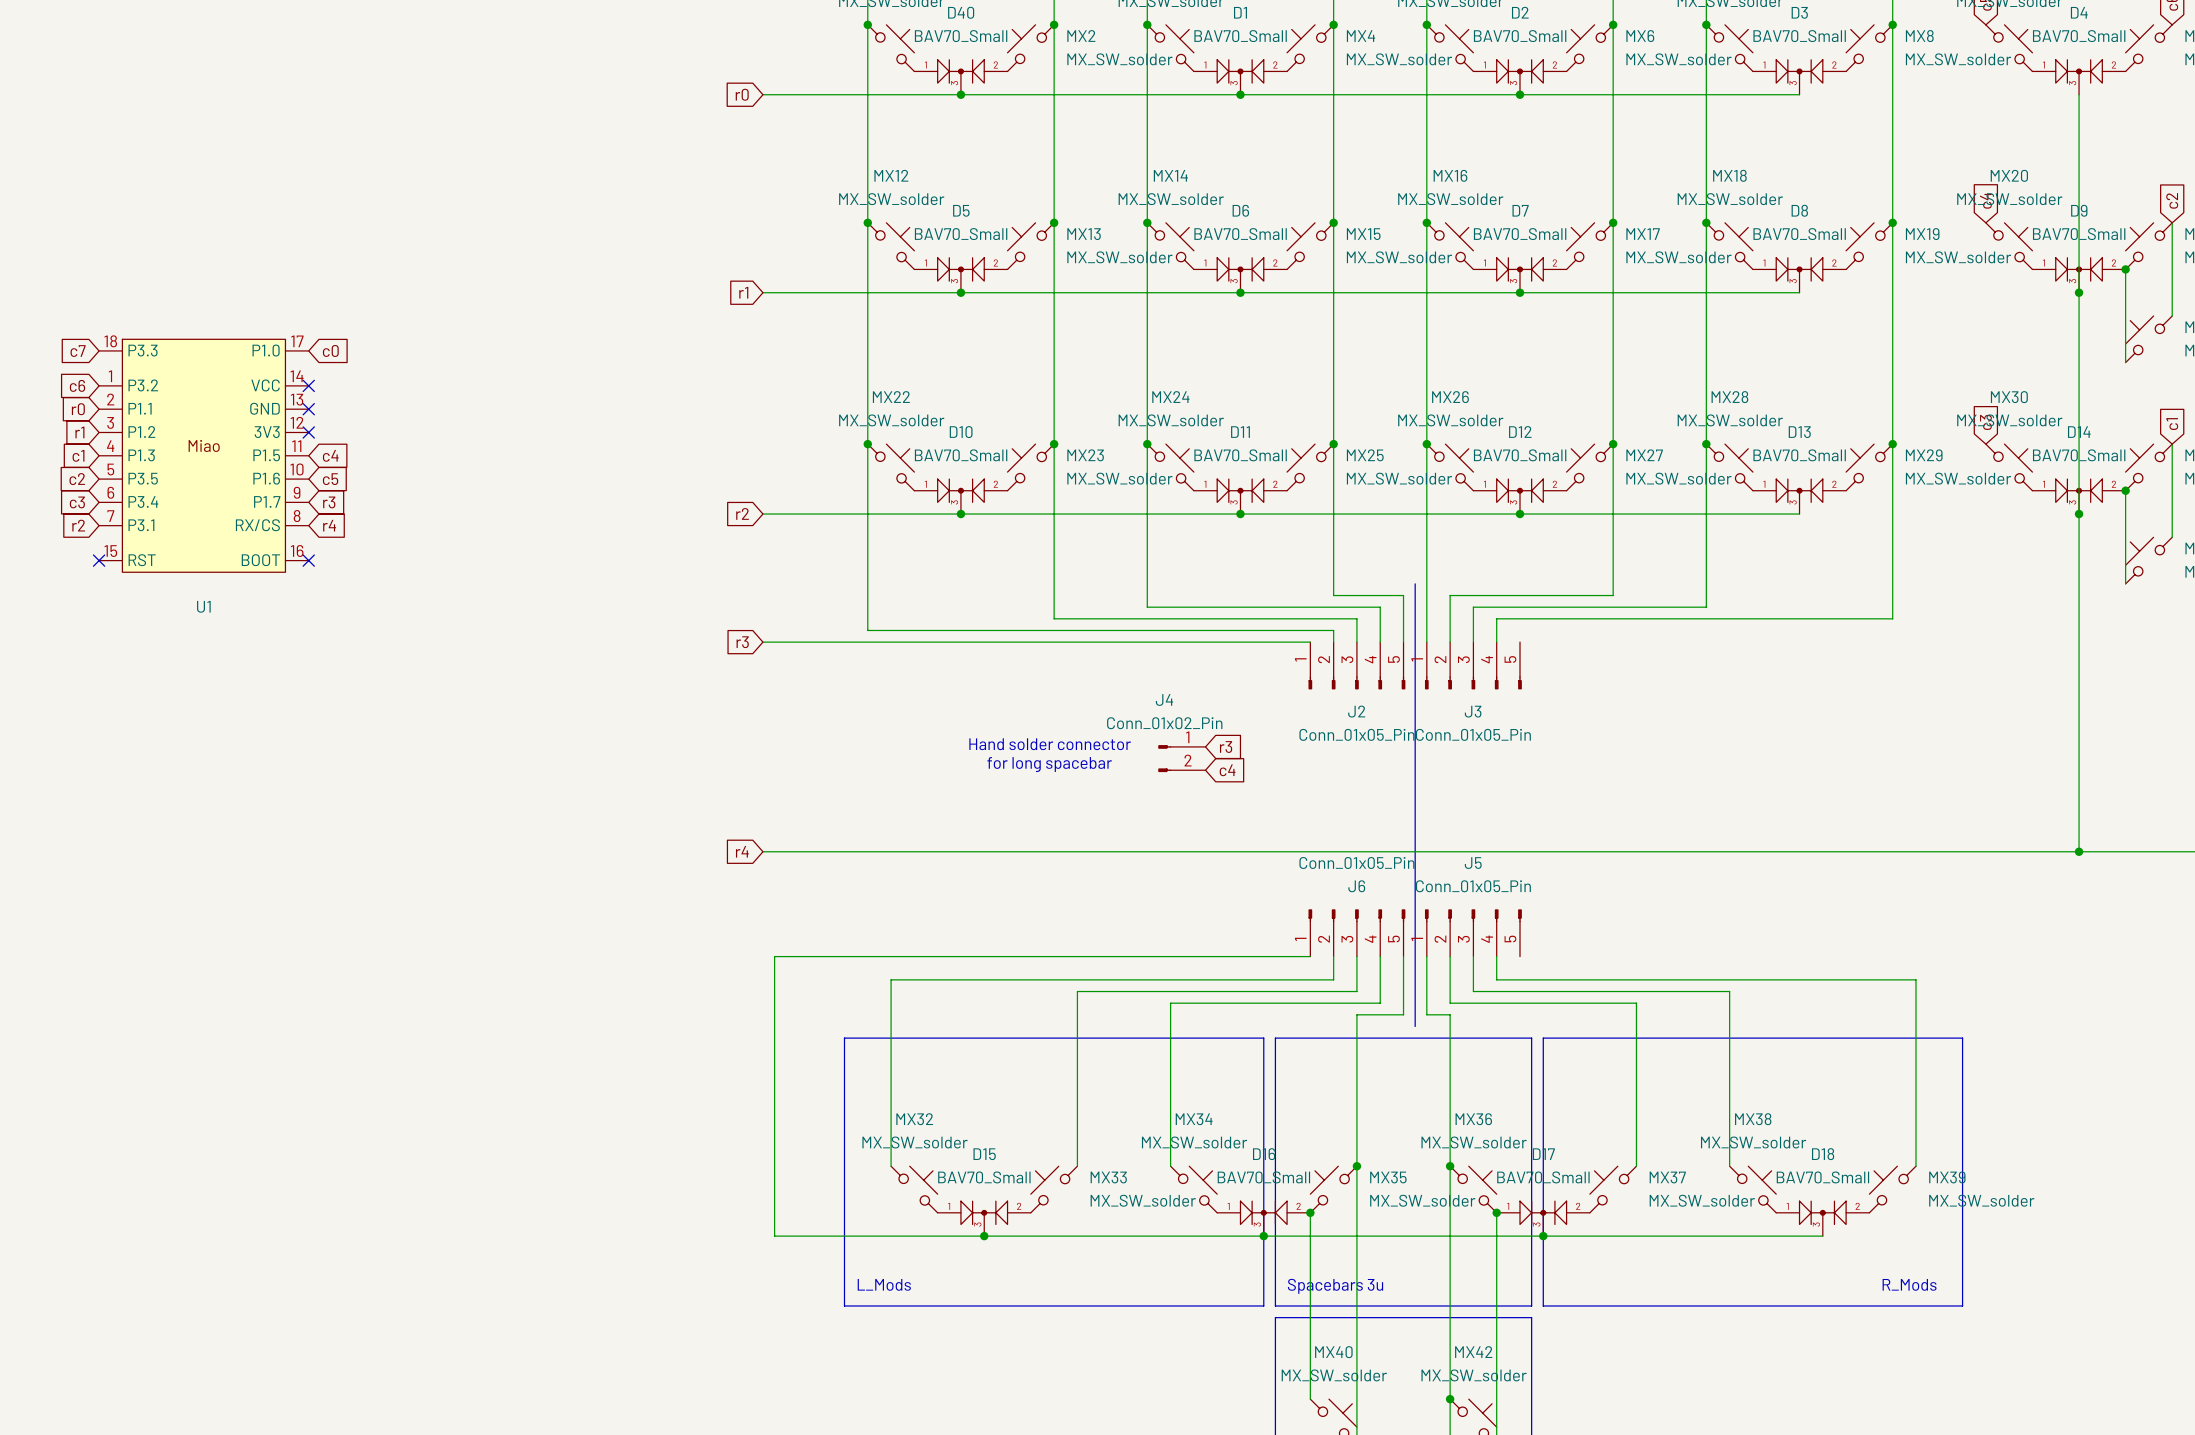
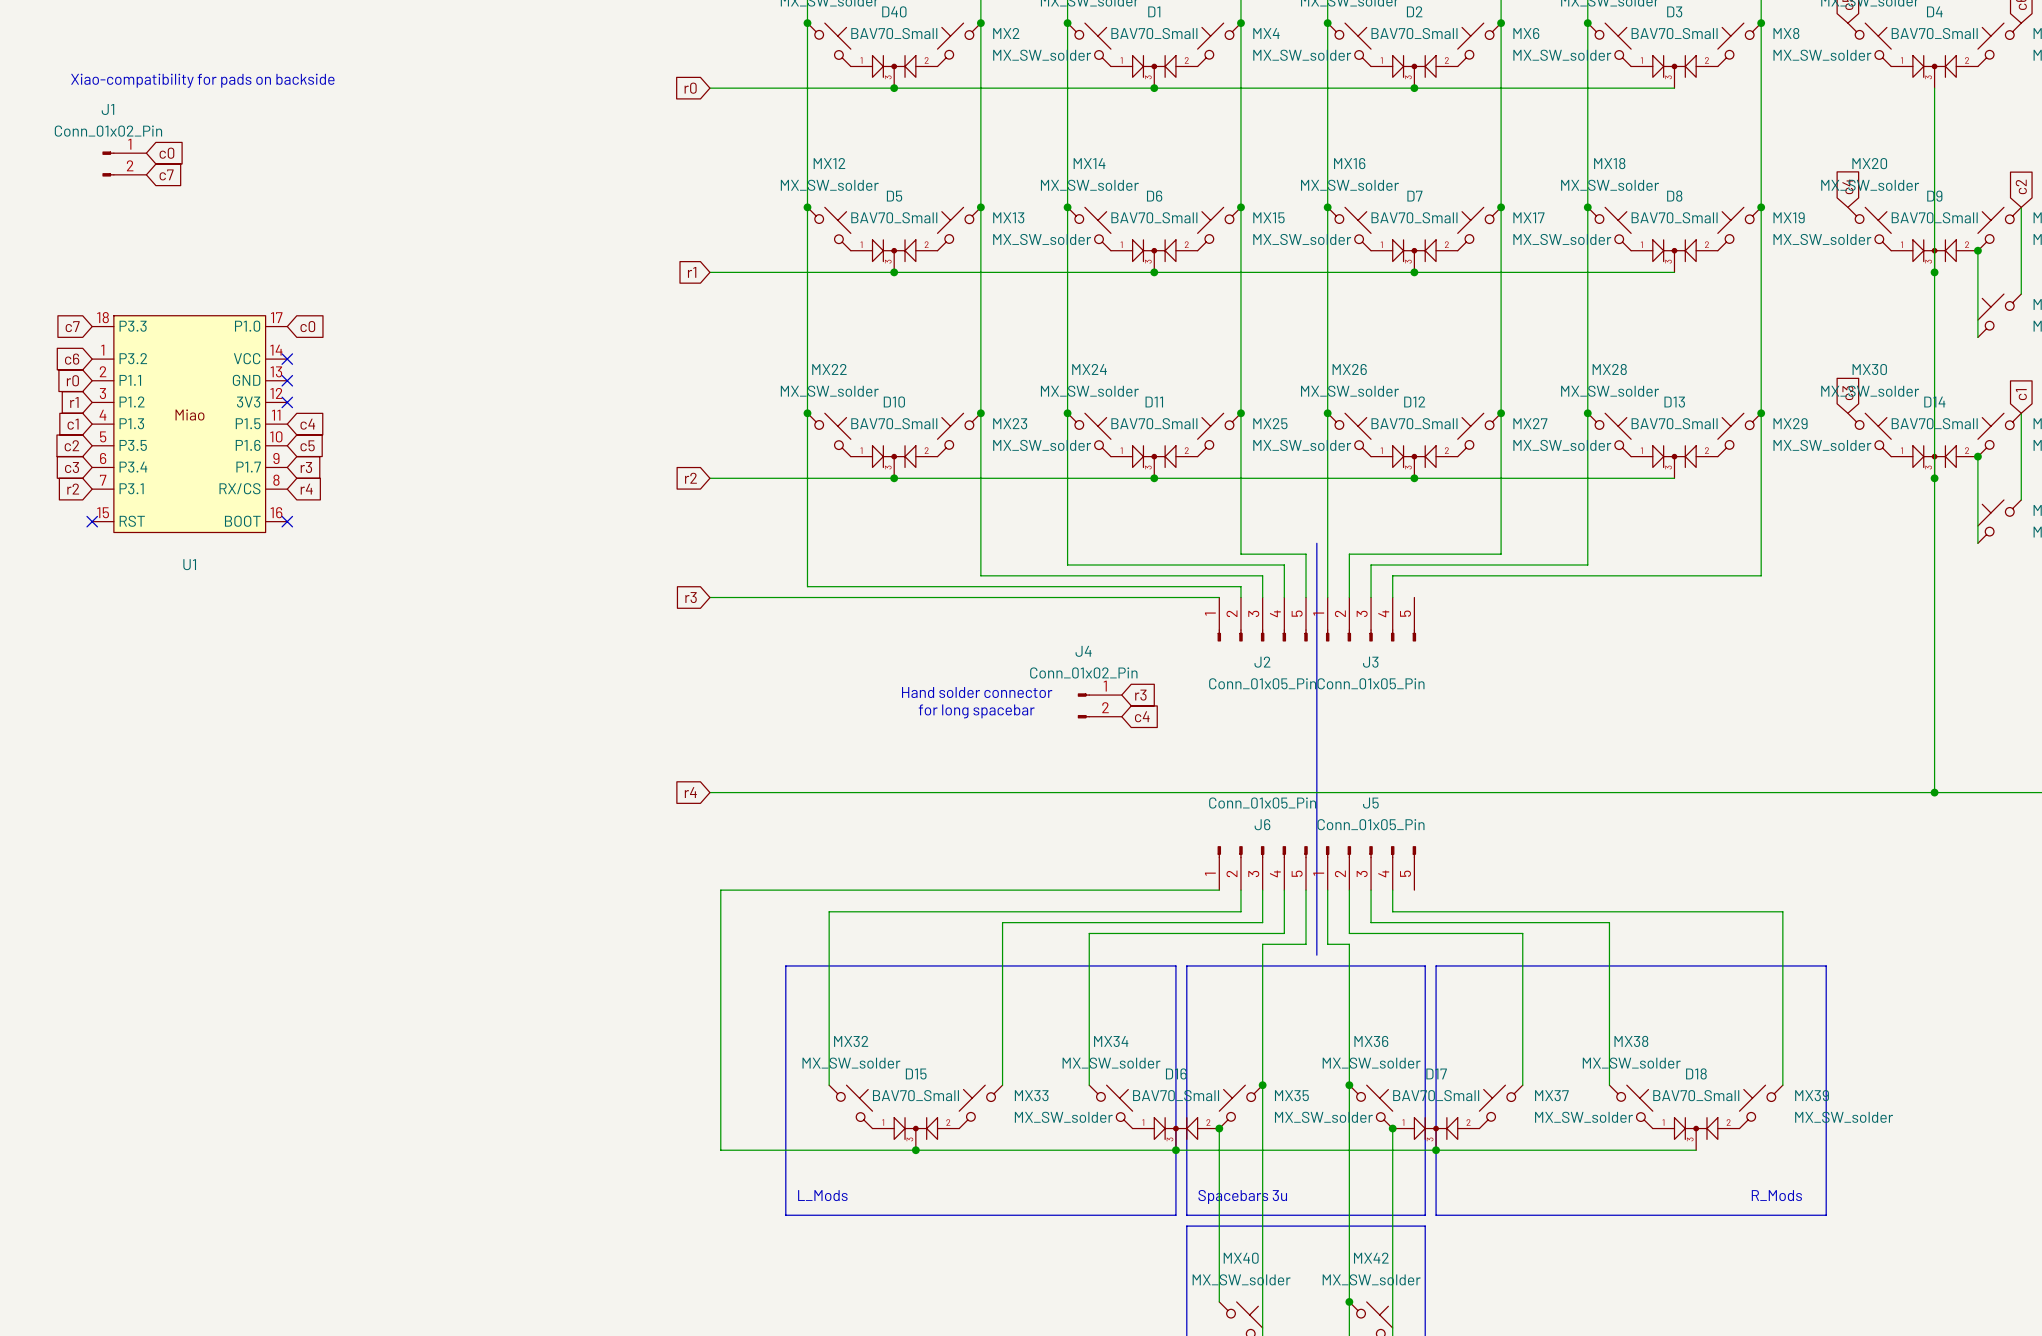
text: none -> Xiao-compatibility for pads on backside (202, 80)
global label: none -> c0 (166, 153)
J1: none -> Conn_01x02_Pin (124, 164)
global label: none -> c7 (166, 174)

